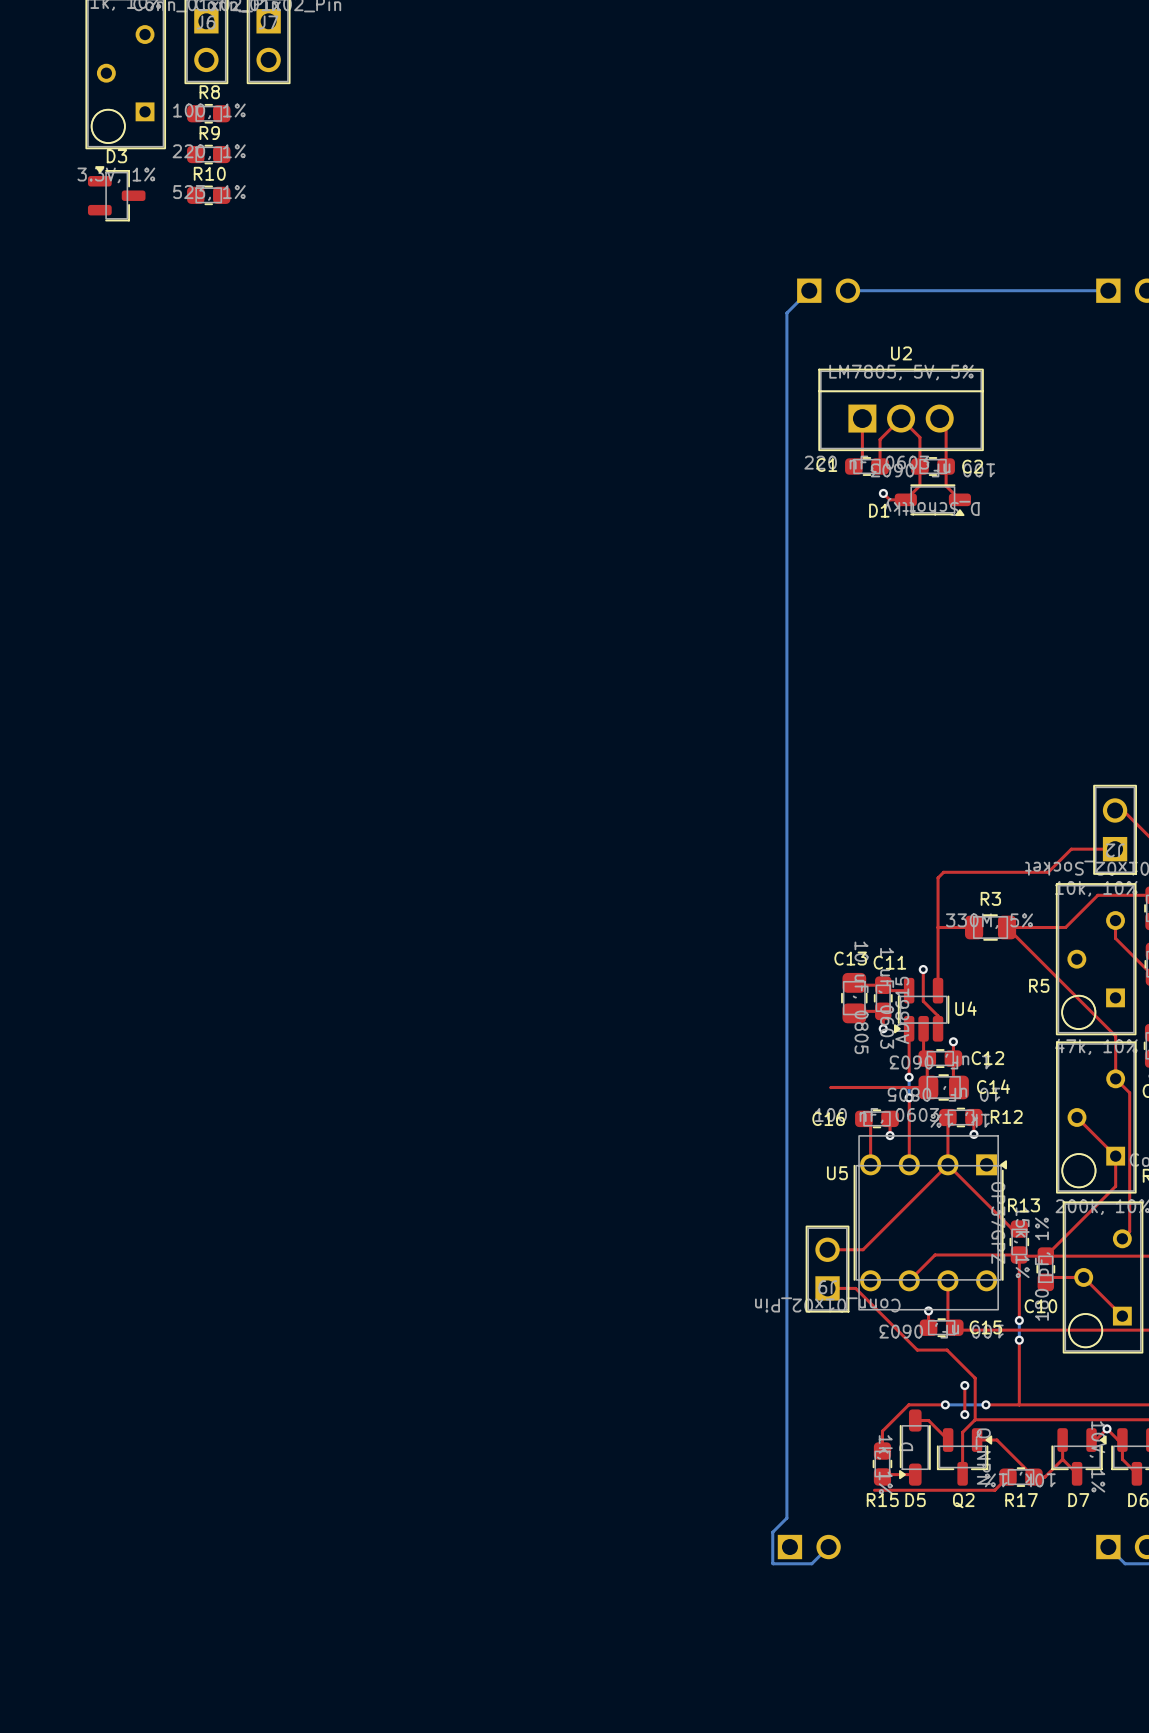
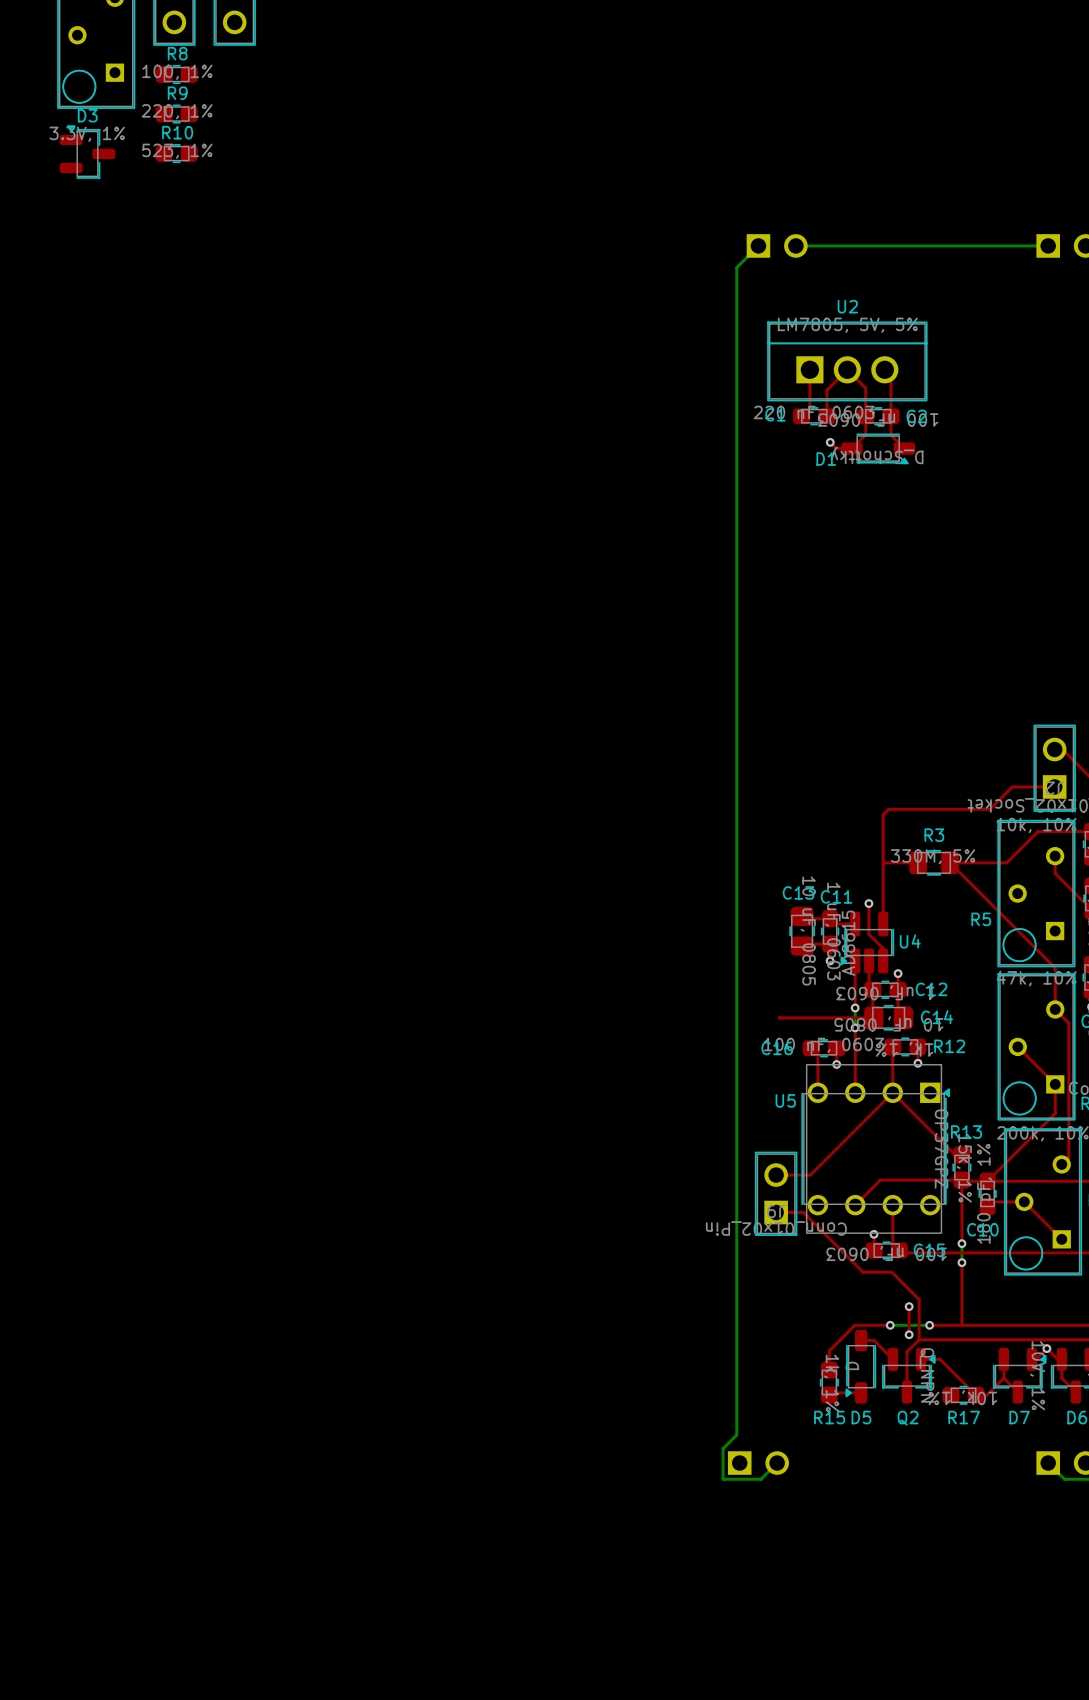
top track: (1008, 1477) (994, 1490) (874, 1490) -> none

